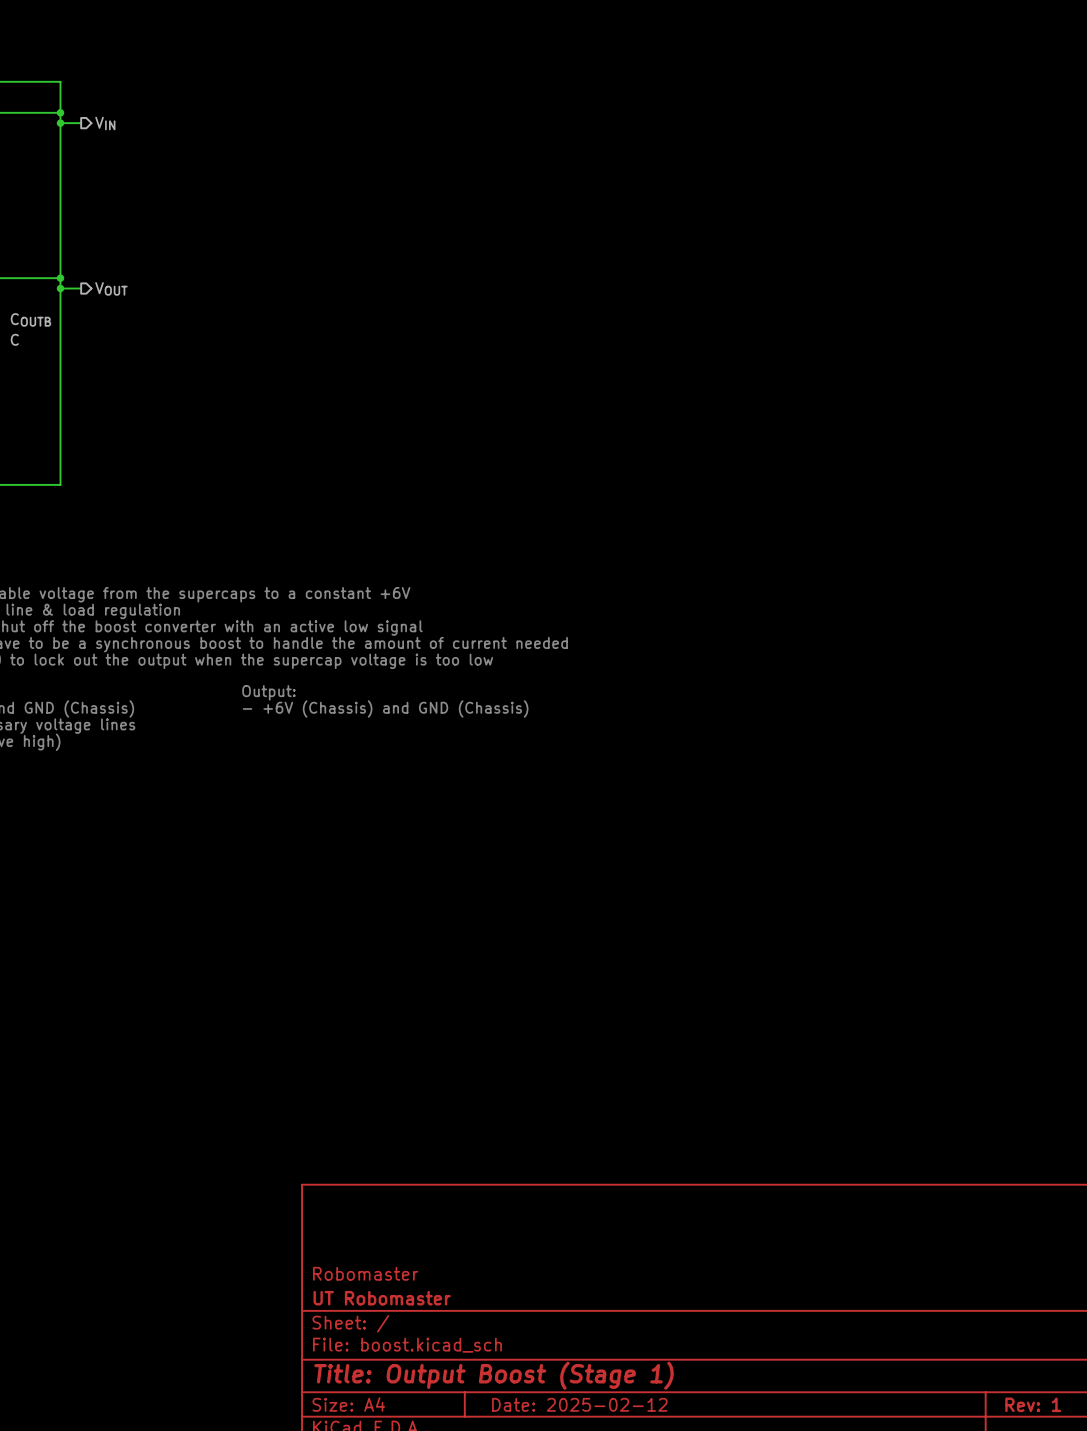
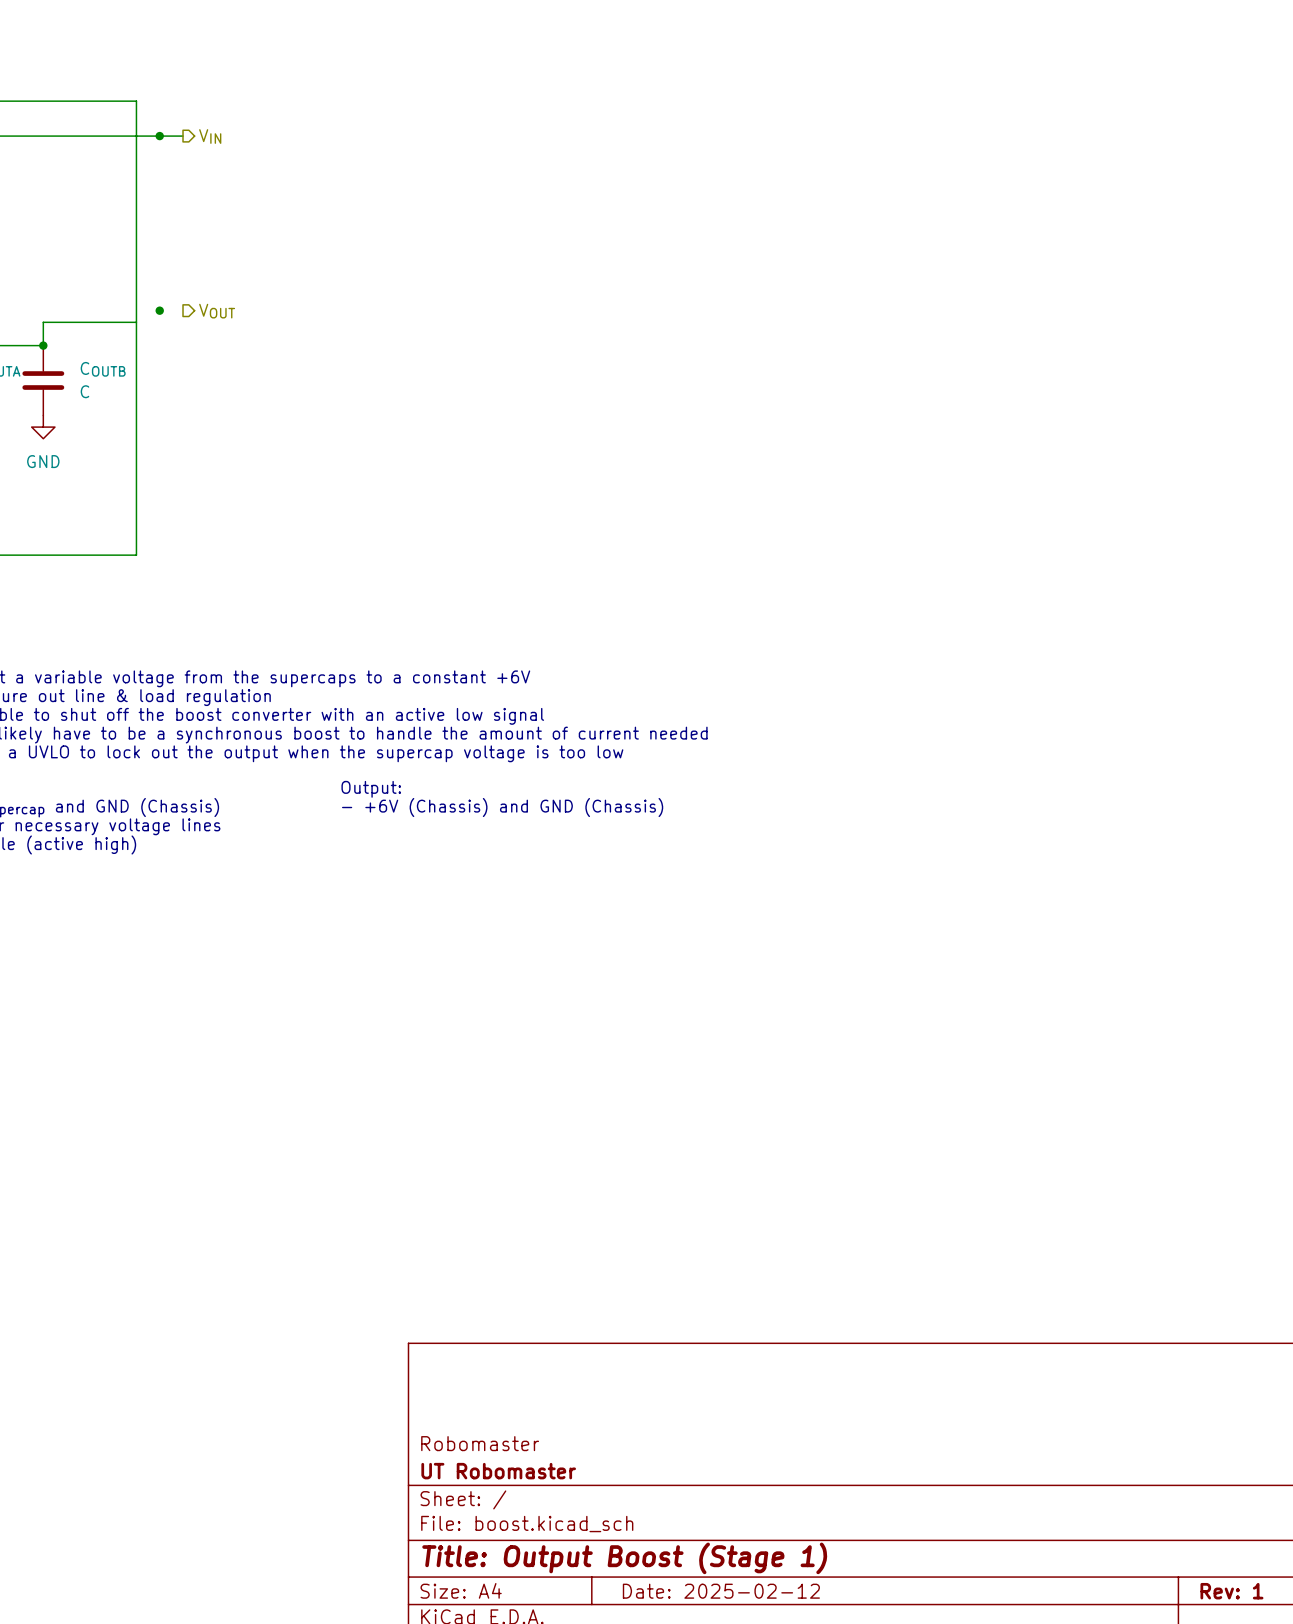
wire: none -> (136, 136) (183, 136)
junction: (60, 112) -> none
junction: none -> (159, 136)
wire: (60, 123) (81, 123) -> none
junction: (60, 123) -> none
hierarchical label position: VIN (105, 123) -> VIN (210, 136)
junction: none -> (159, 310)
junction: (60, 278) -> none
wire: (60, 288) (81, 288) -> none
junction: (60, 288) -> none
hierarchical label position: VOUT (111, 288) -> VOUT (217, 311)

